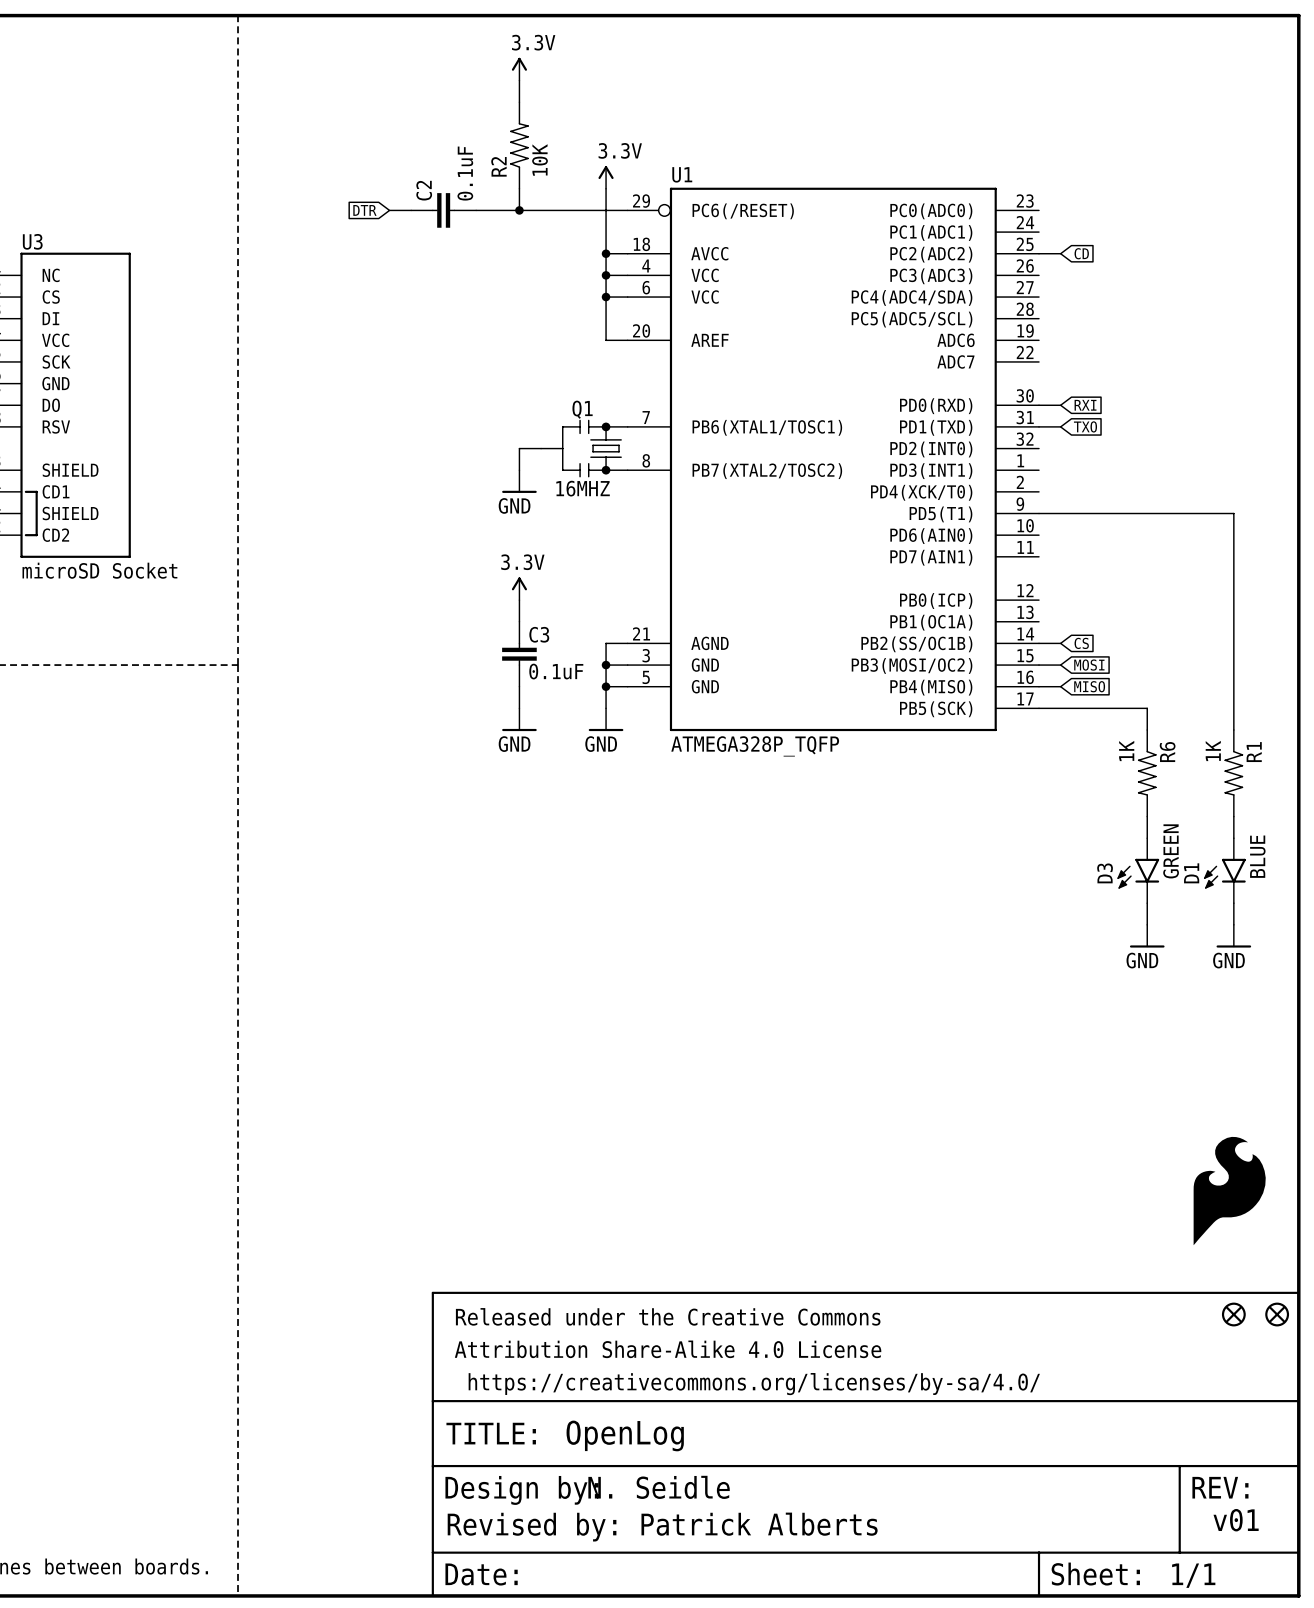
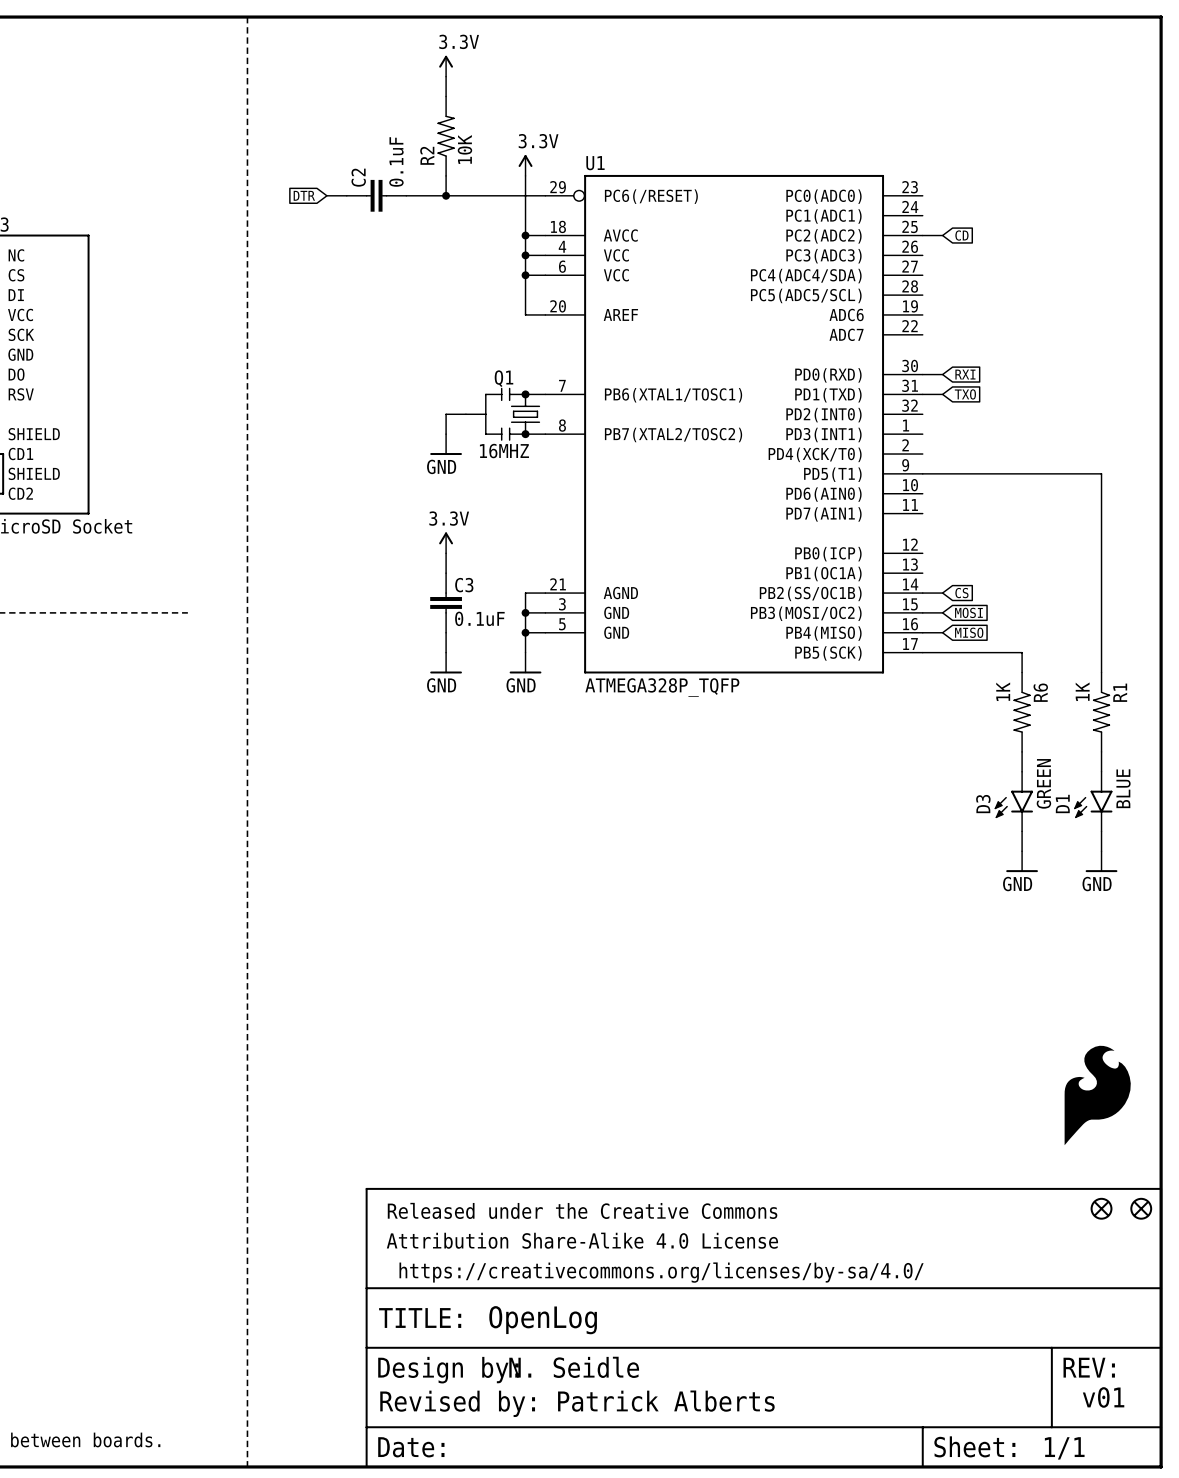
line: (238, 15) (238, 1595) -> (247, 17) (247, 1466)

